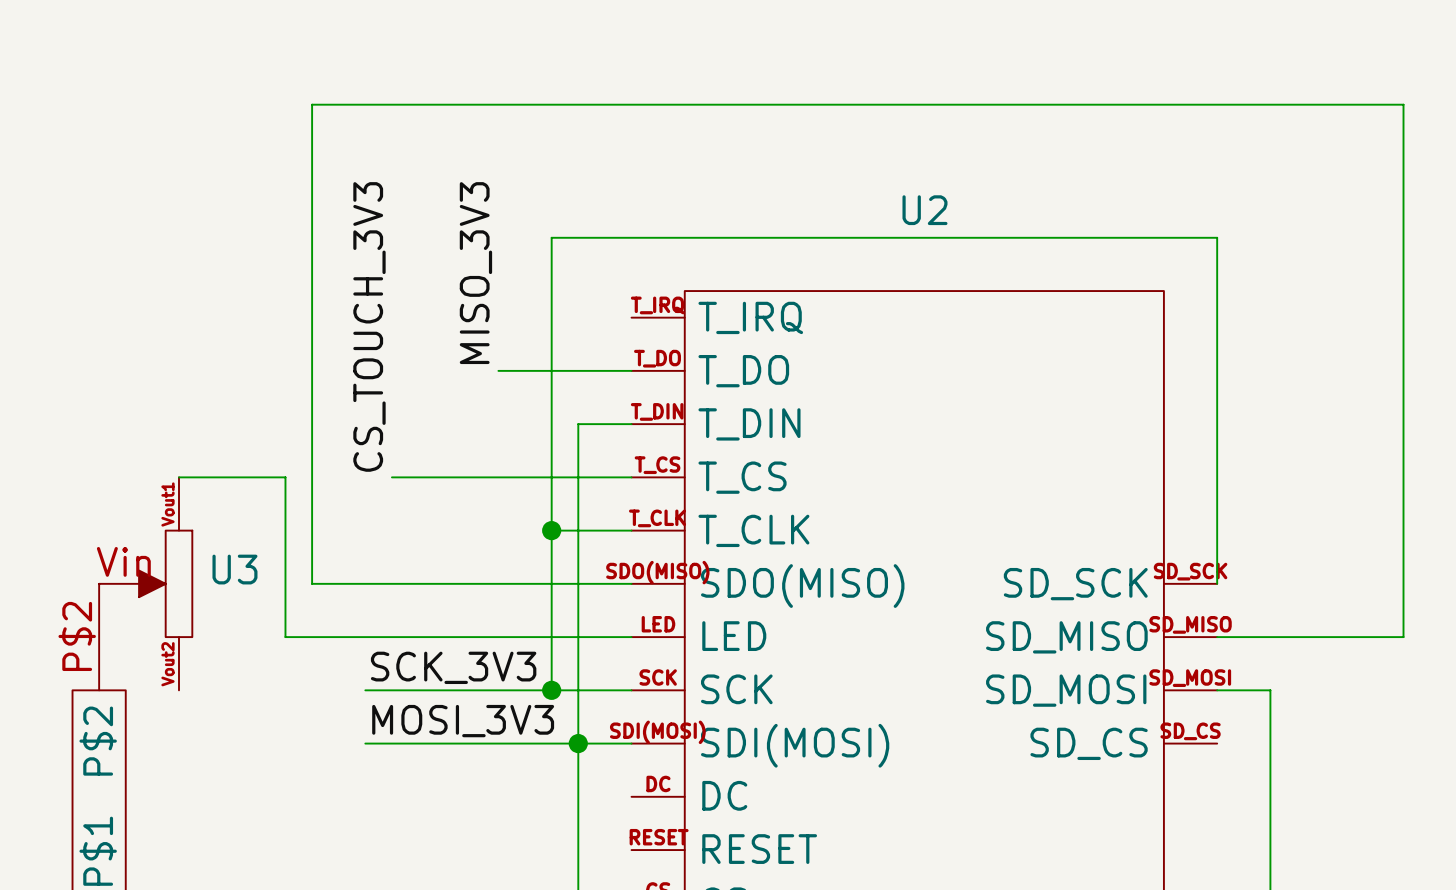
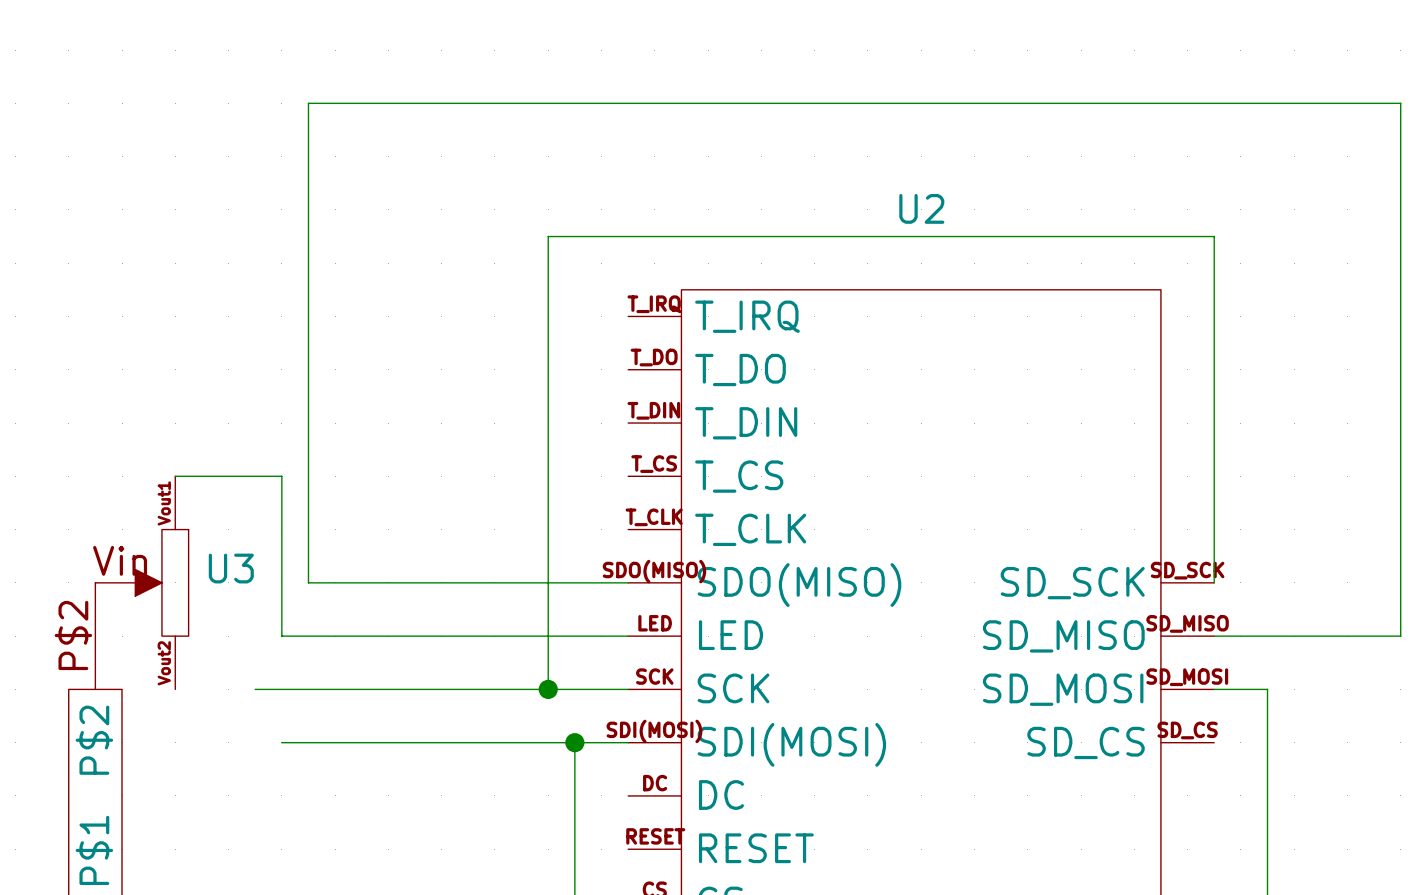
label: MISO_3V3 (475, 273) -> none
label: CS_TOUCH_3V3 (369, 326) -> none
wire: (498, 370) (631, 370) -> none
wire: (631, 424) (578, 424) (578, 743) -> none
wire: (391, 477) (631, 477) -> none
wire: (551, 530) (631, 530) -> (281, 742) (361, 742)
junction: (551, 530) -> none
label: SCK_3V3 (453, 667) -> none
wire: none -> (255, 689) (361, 689)
label: MOSI_3V3 (463, 721) -> none

